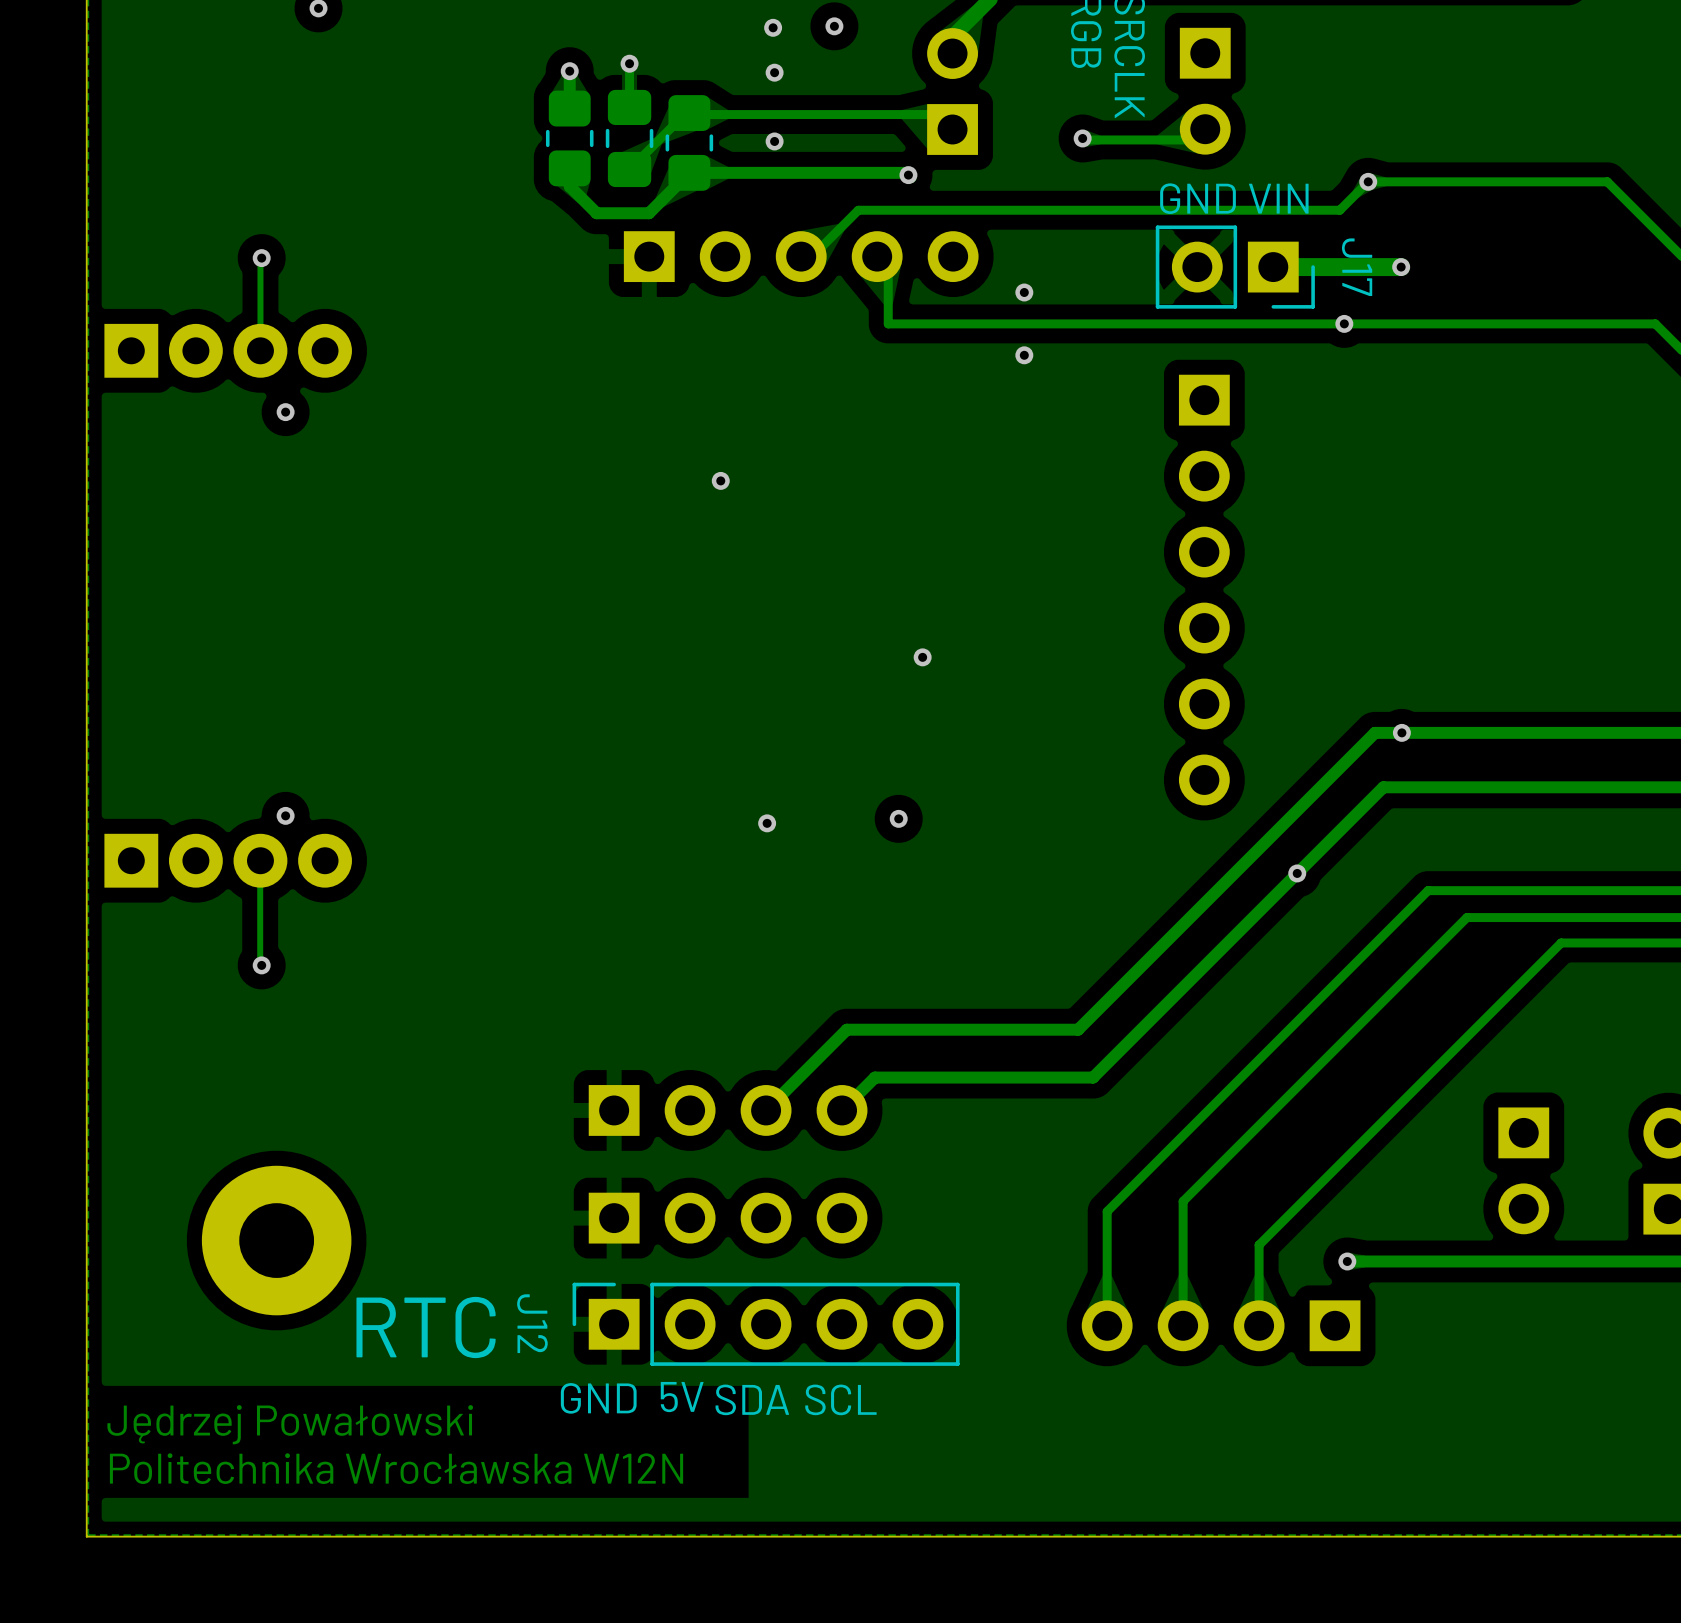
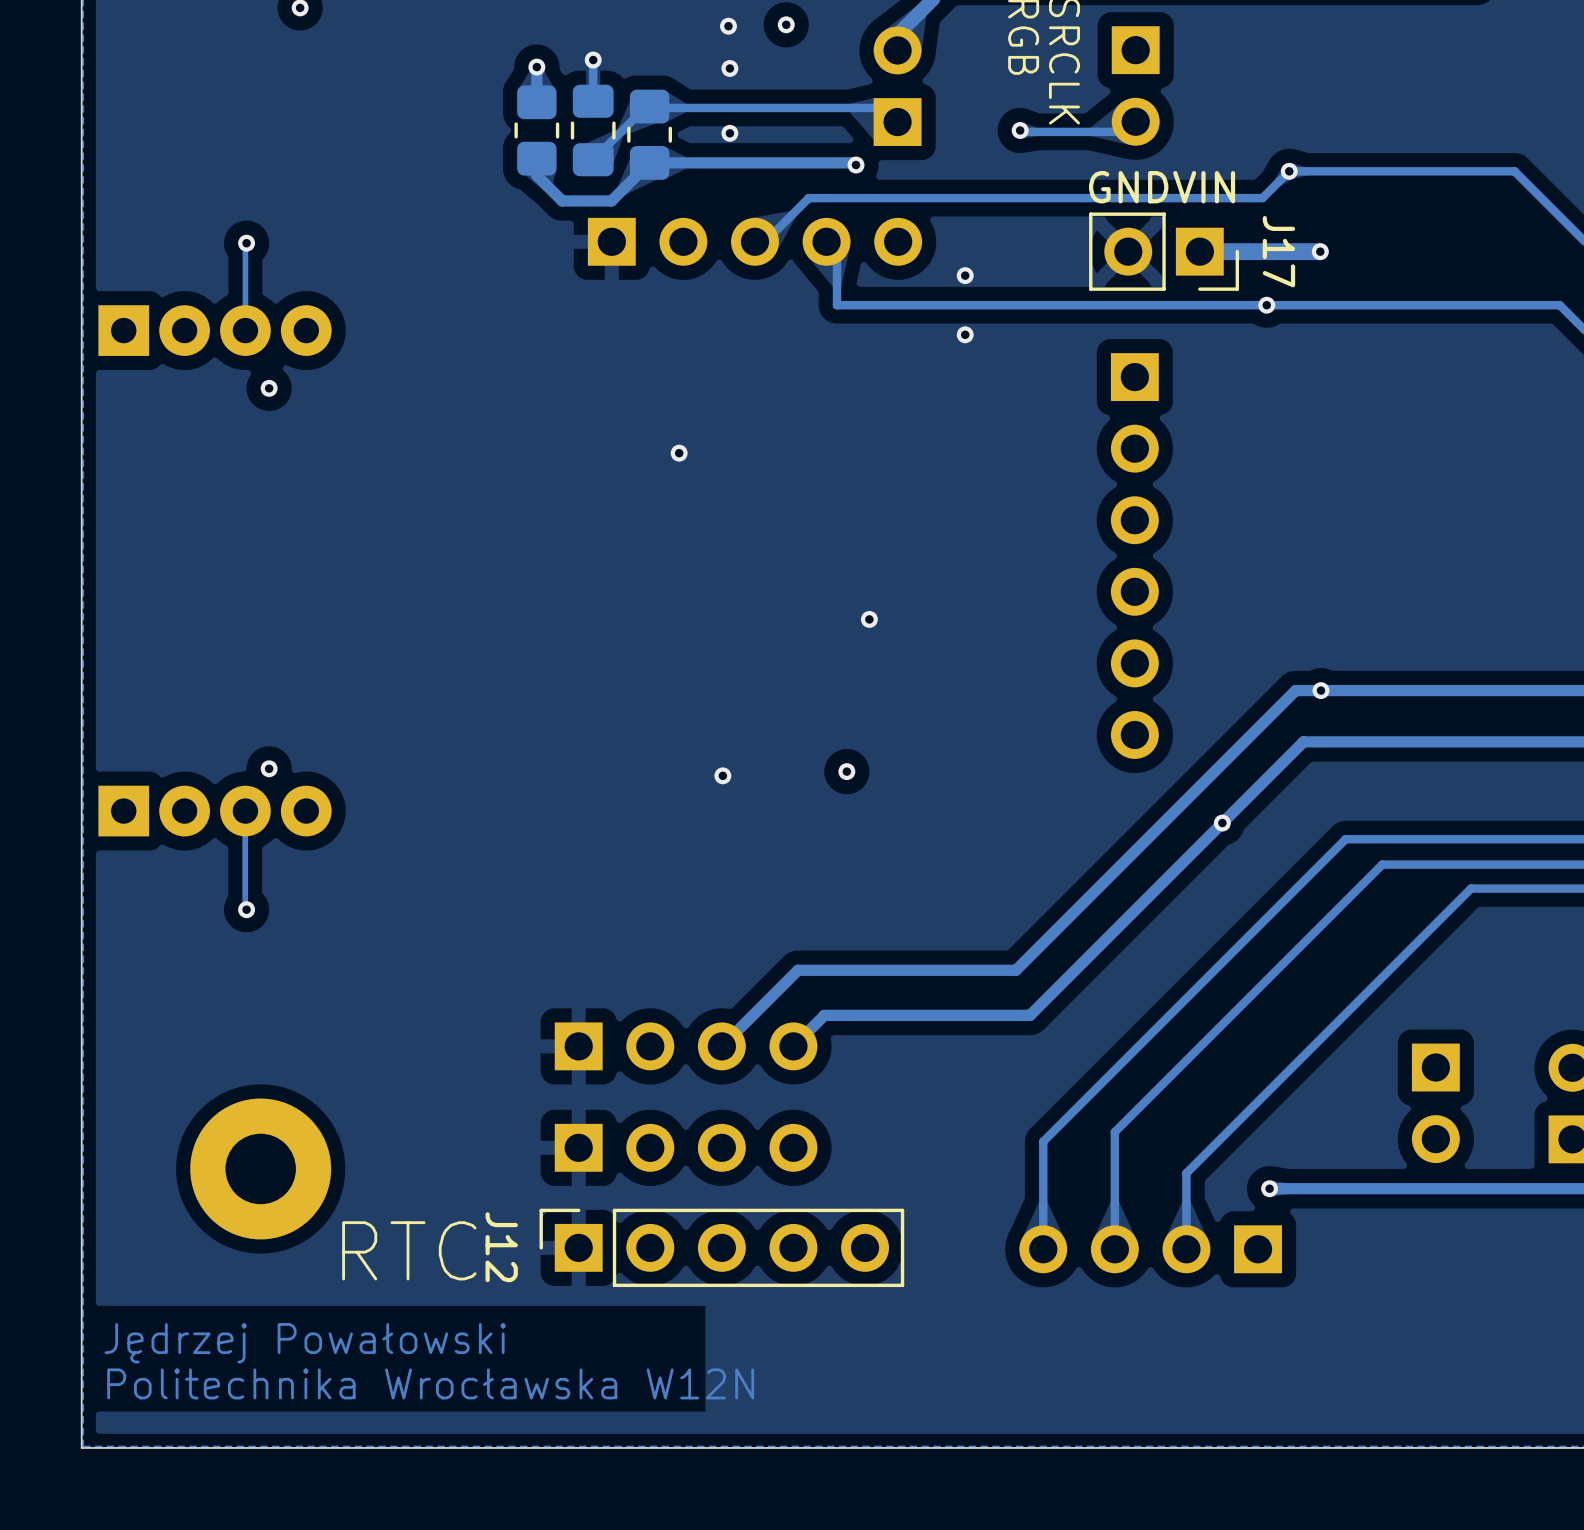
text: 5V (682, 1397) -> none
text: GND (598, 1398) -> none
text: SDA (752, 1399) -> none
text: SCL (840, 1399) -> none

